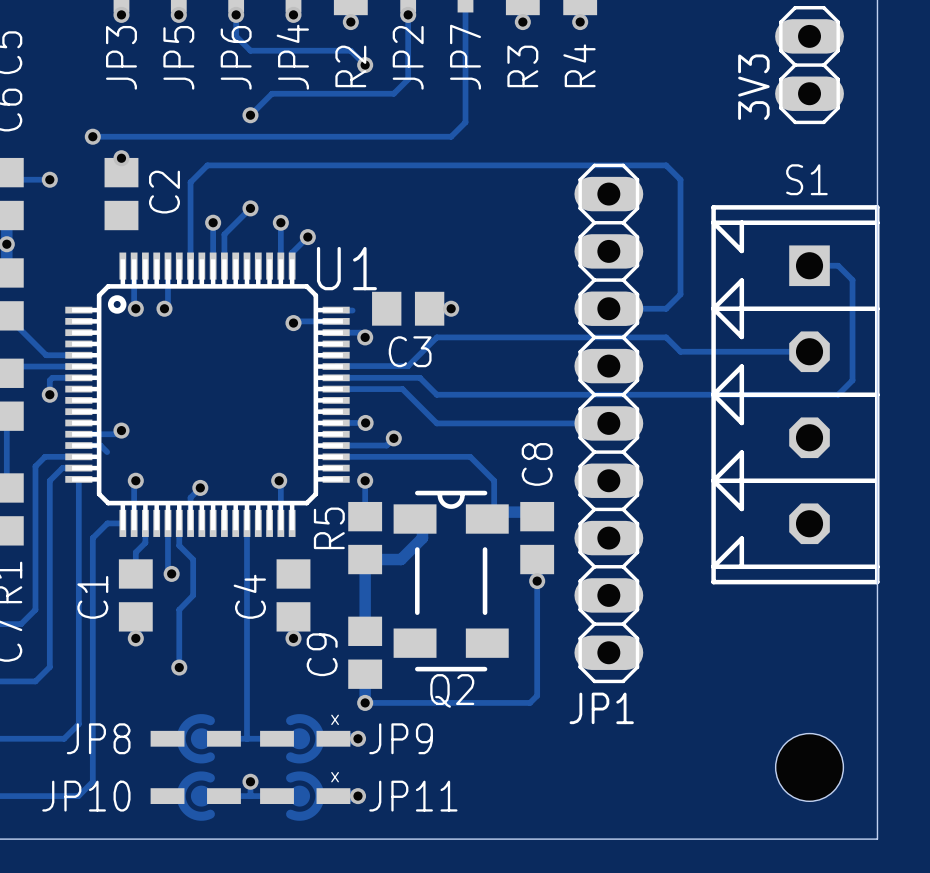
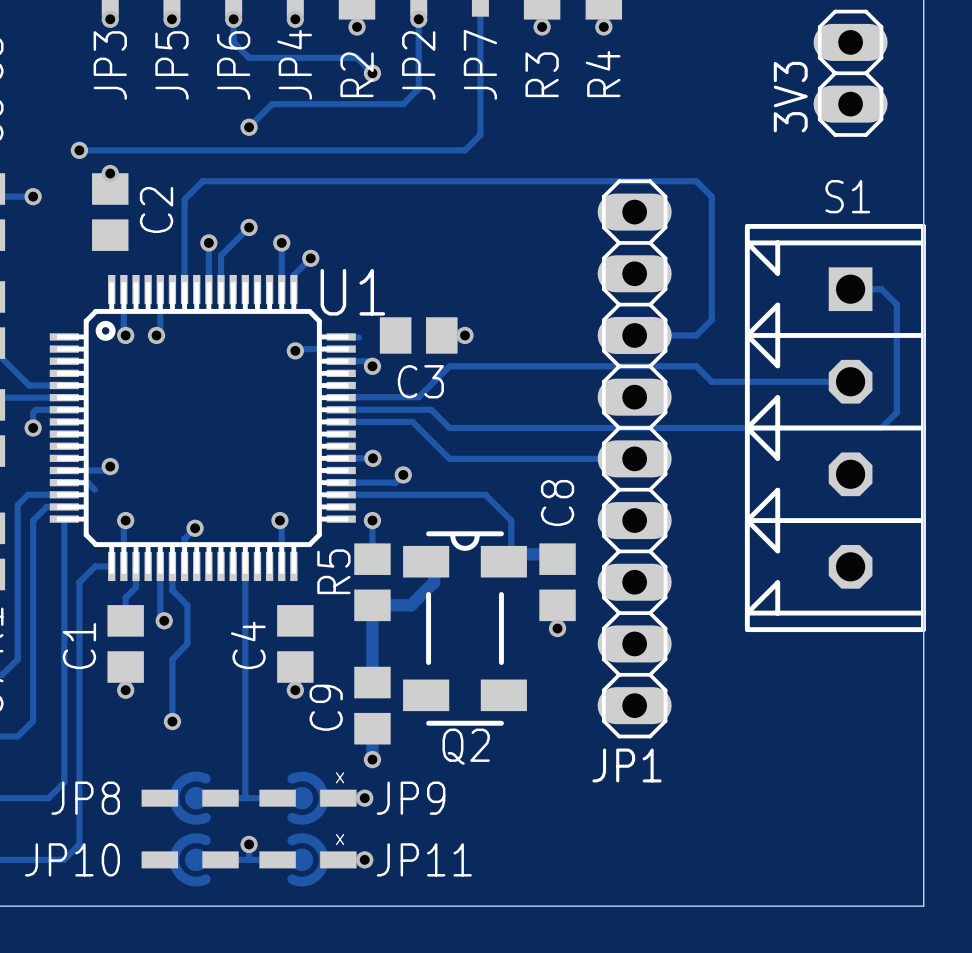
track: (537, 581) (537, 695) (530, 702) (365, 702) -> none
hole: (809, 767) -> none

